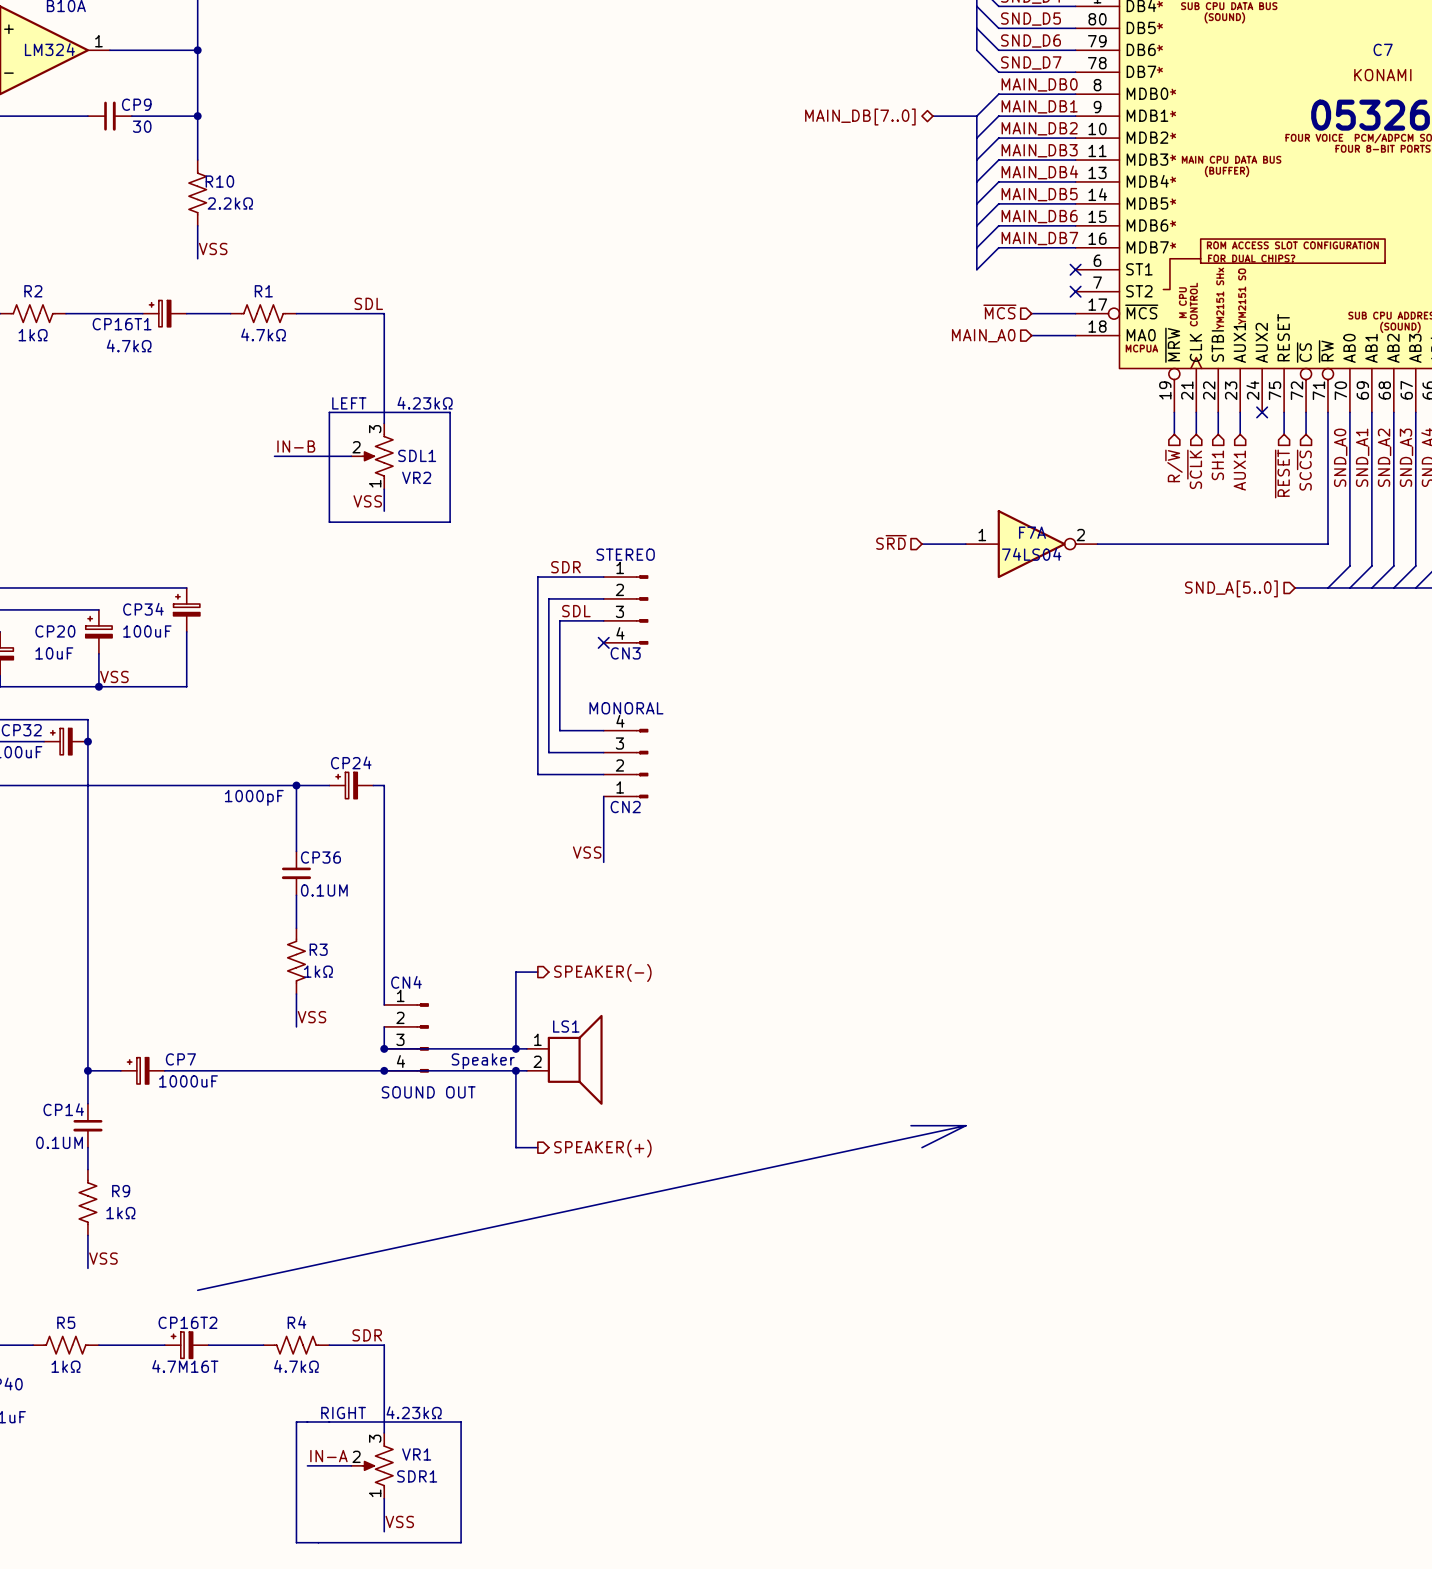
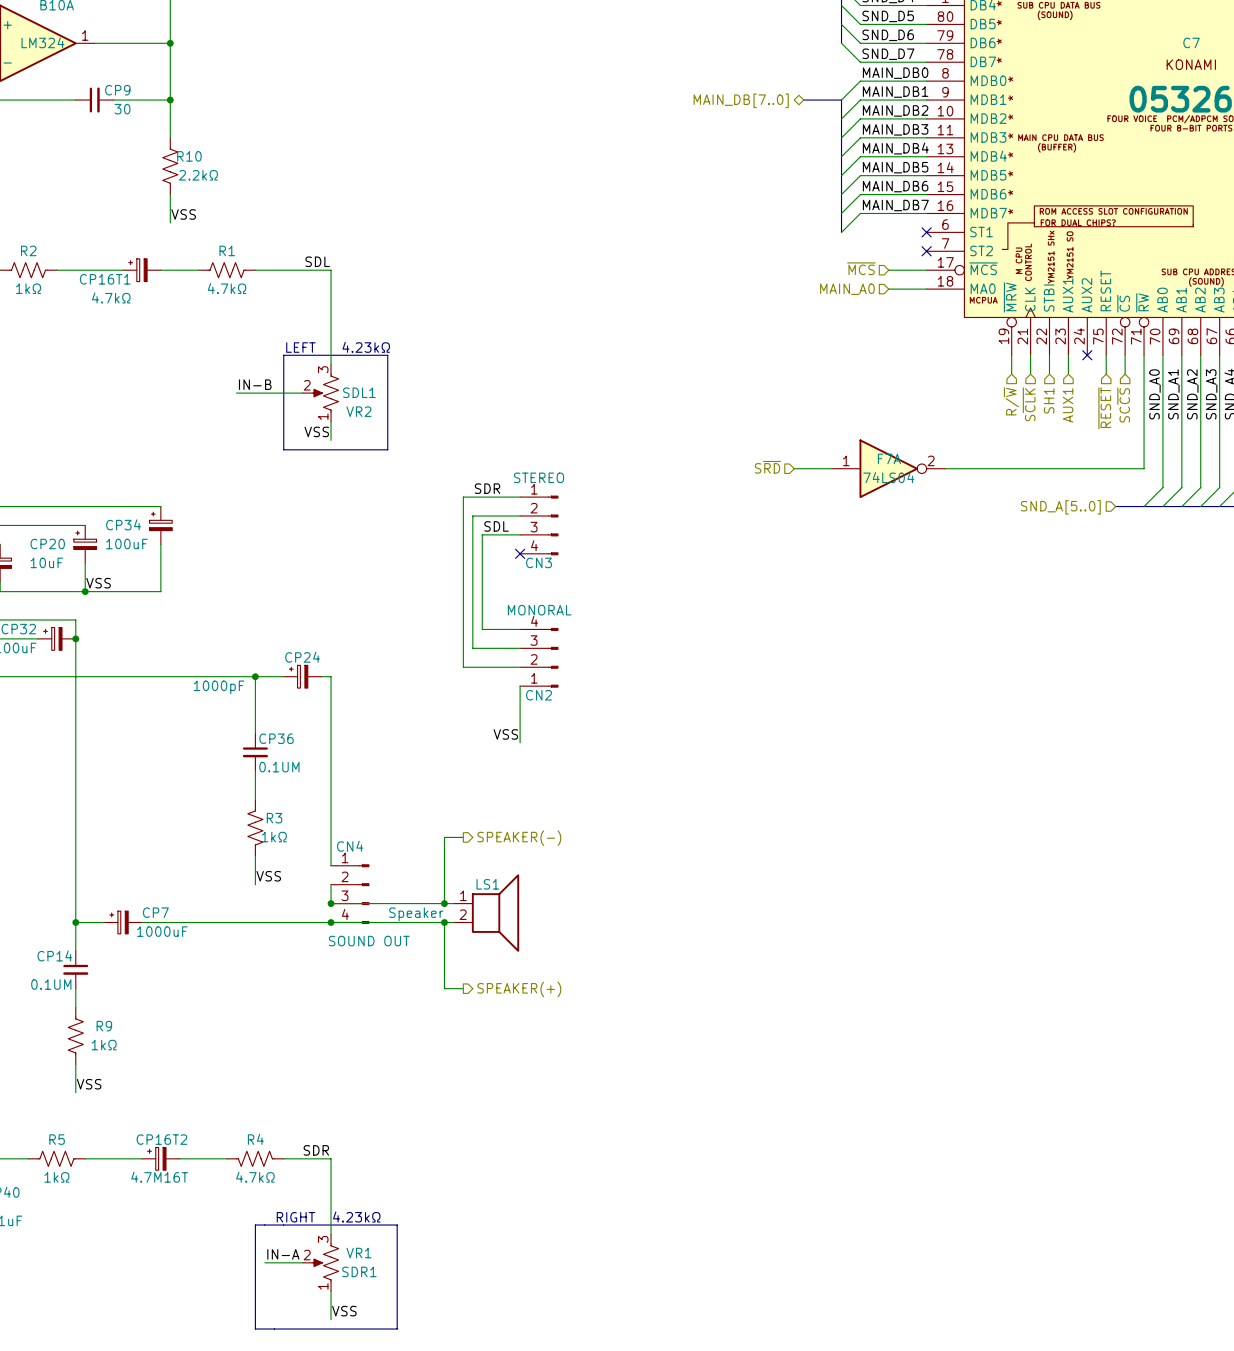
line: (910, 1125) (965, 1125) -> none
line: (965, 1125) (197, 1290) -> none
line: (965, 1125) (921, 1147) -> none

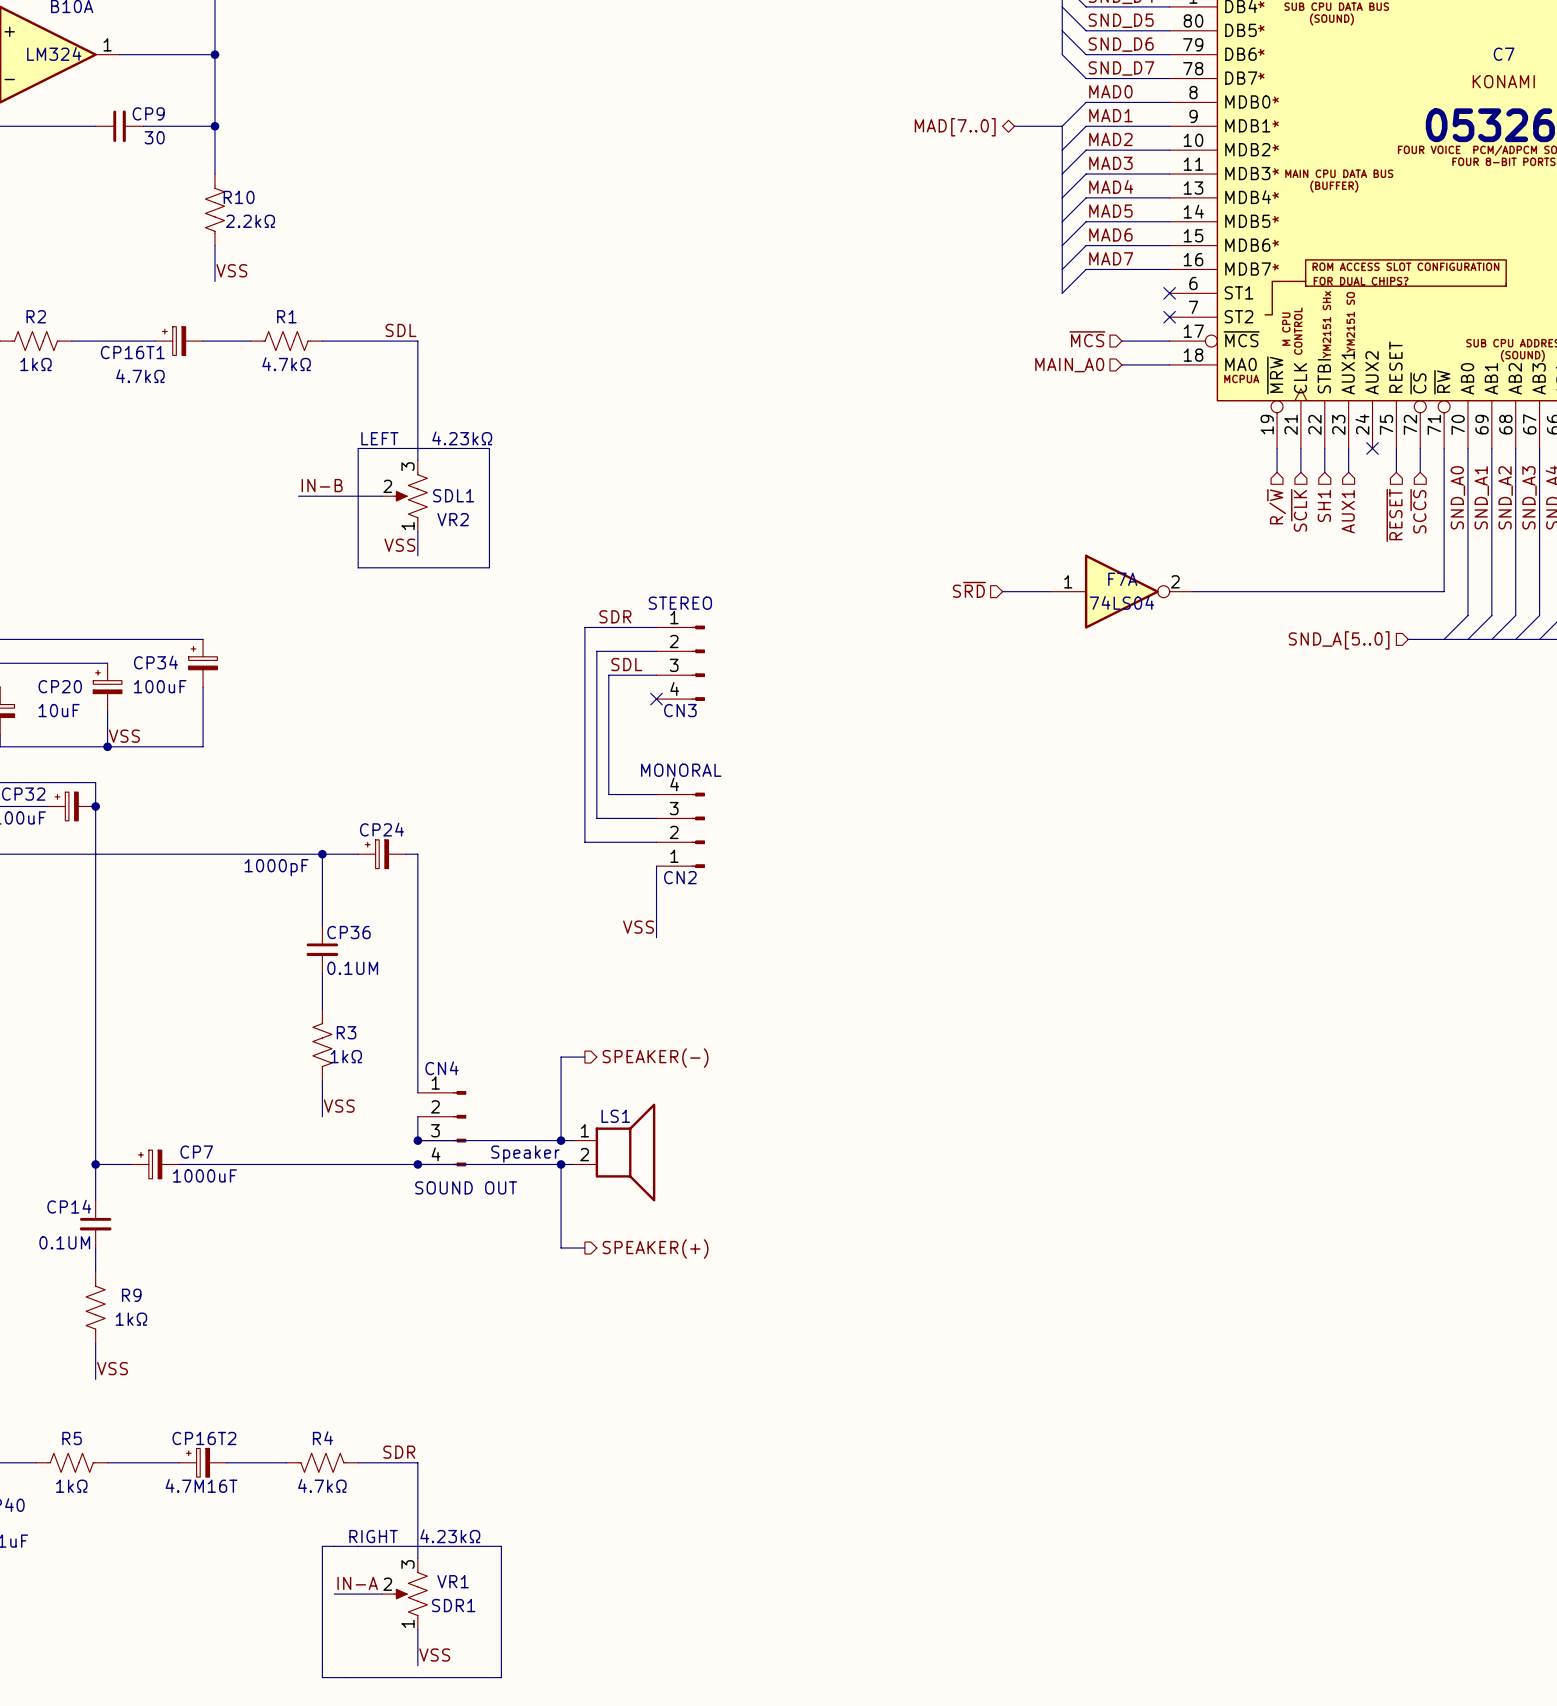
label: MAIN_DB0 (895, 73) -> MAD0 (1110, 91)
label: MAIN_DB1 (895, 92) -> MAD1 (1110, 115)
hierarchical label: MAIN_DB[7..0] (741, 100) -> MAD[7..0] (955, 127)
label: MAIN_DB2 (895, 110) -> MAD2 (1110, 139)
label: MAIN_DB3 (895, 129) -> MAD3 (1110, 163)
label: MAIN_DB4 (895, 148) -> MAD4 (1111, 186)
label: MAIN_DB5 (895, 167) -> MAD5 (1110, 211)
label: MAIN_DB6 (895, 186) -> MAD6 (1110, 234)
label: MAIN_DB7 (895, 205) -> MAD7 (1111, 258)

